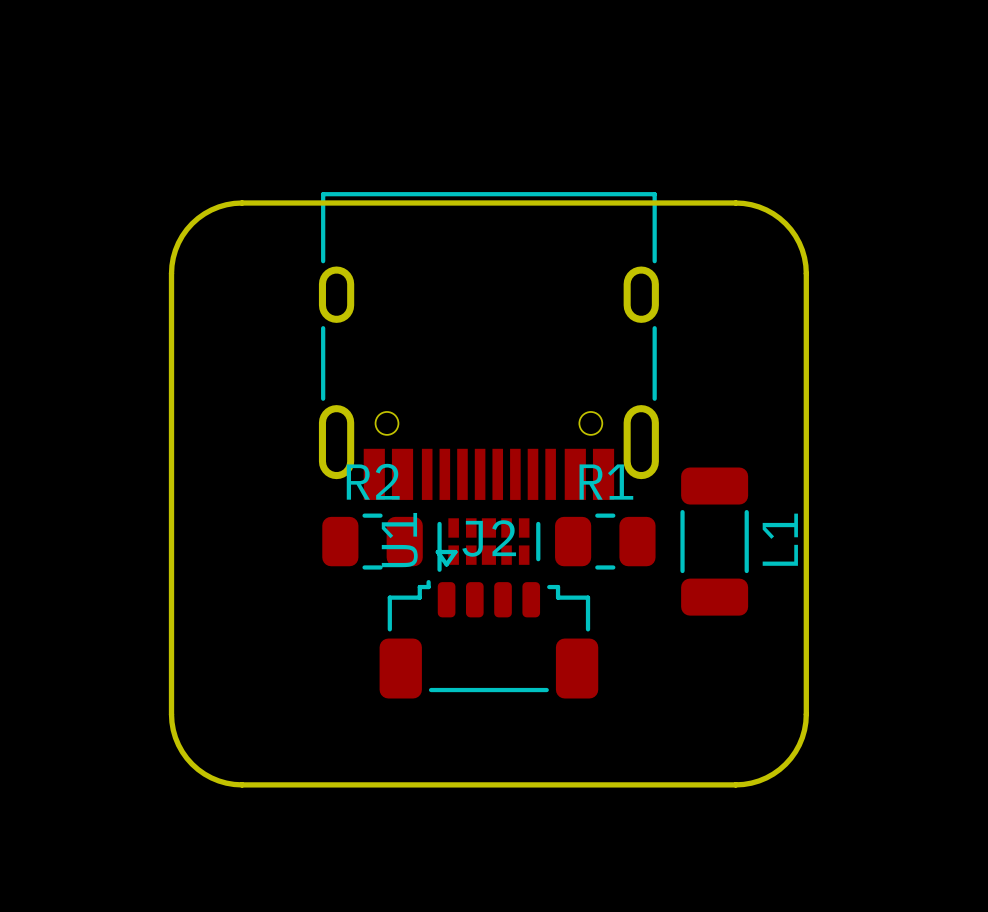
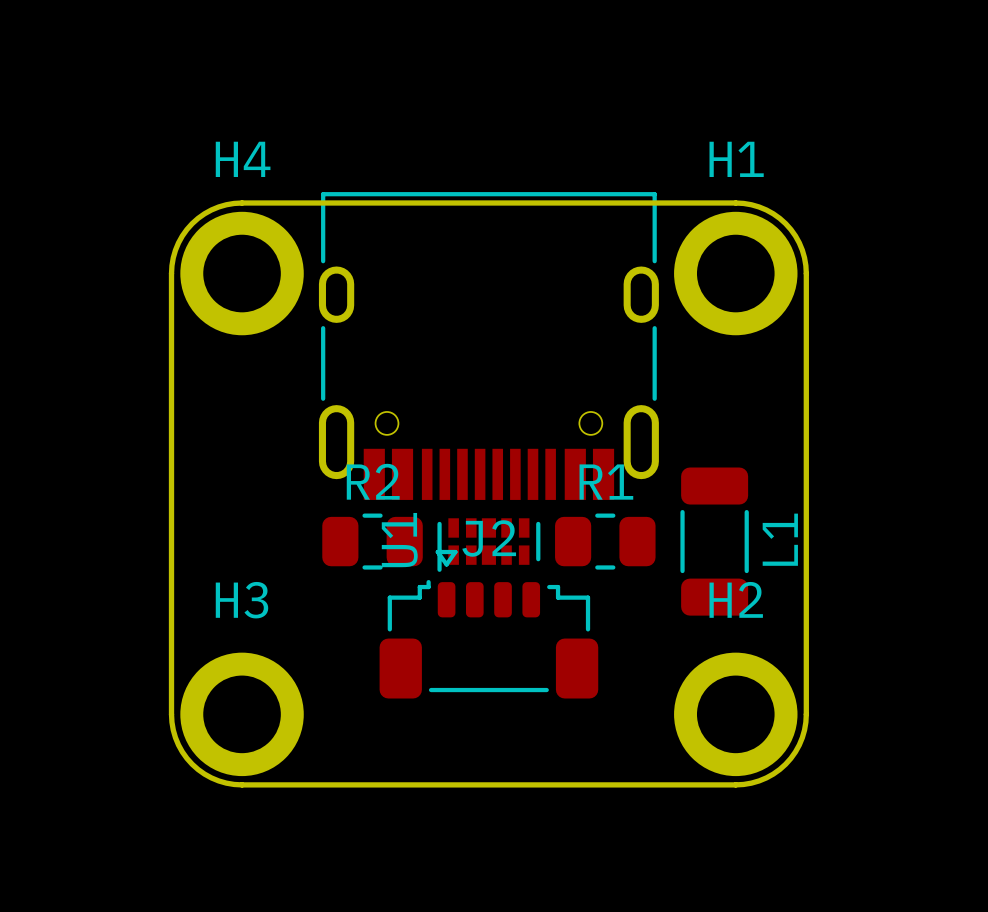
H4: none -> (242, 273)
H1: none -> (735, 273)
H3: none -> (242, 714)
H2: none -> (735, 714)

